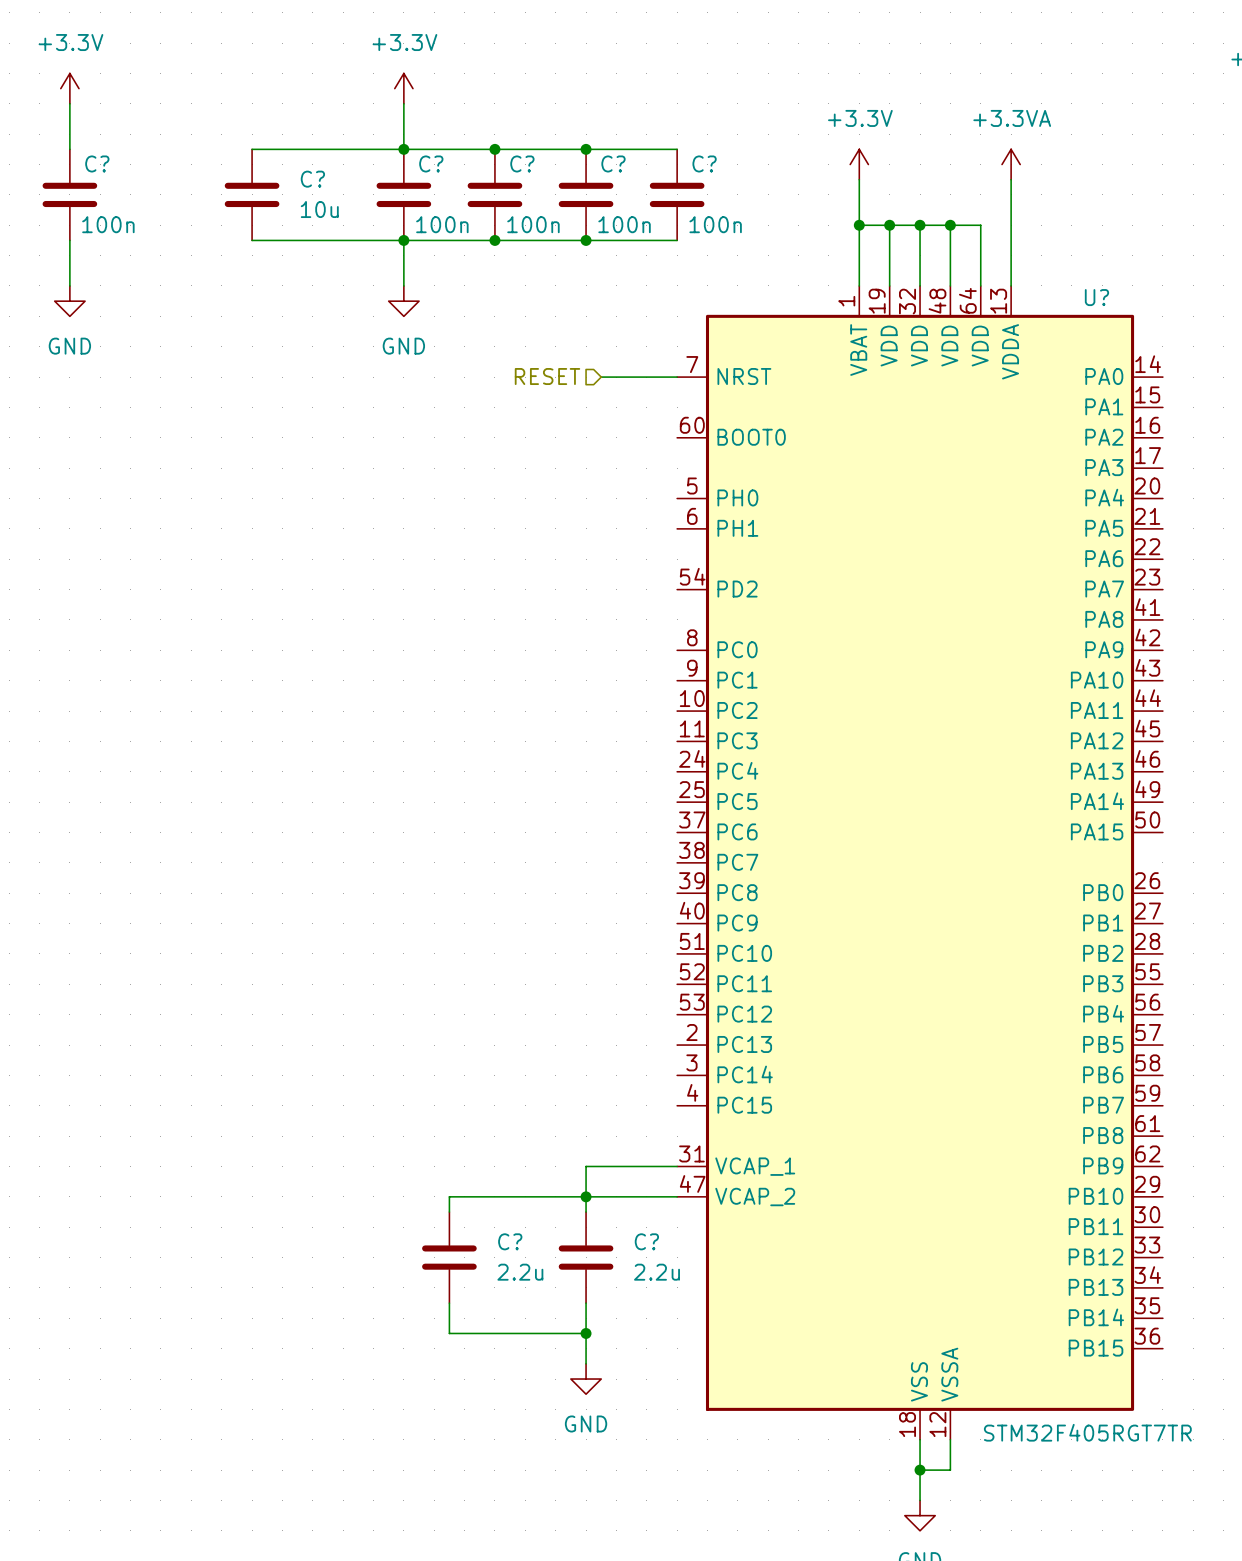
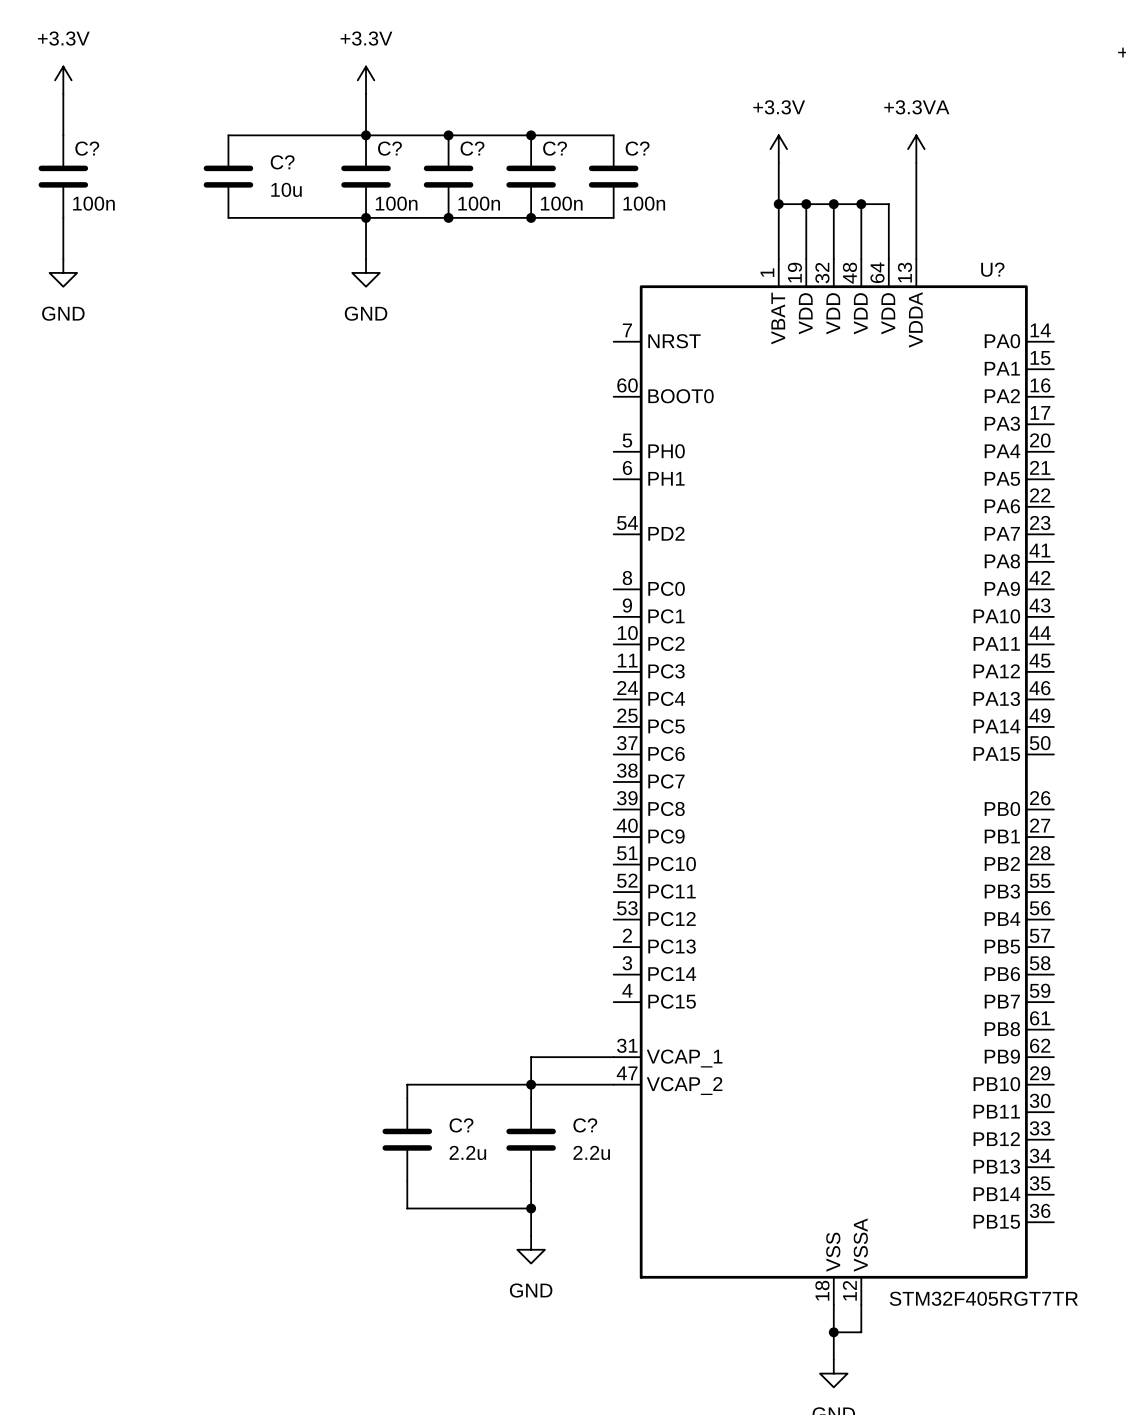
hierarchical label: RESET (547, 376) -> none
wire: (601, 377) (677, 377) -> none

